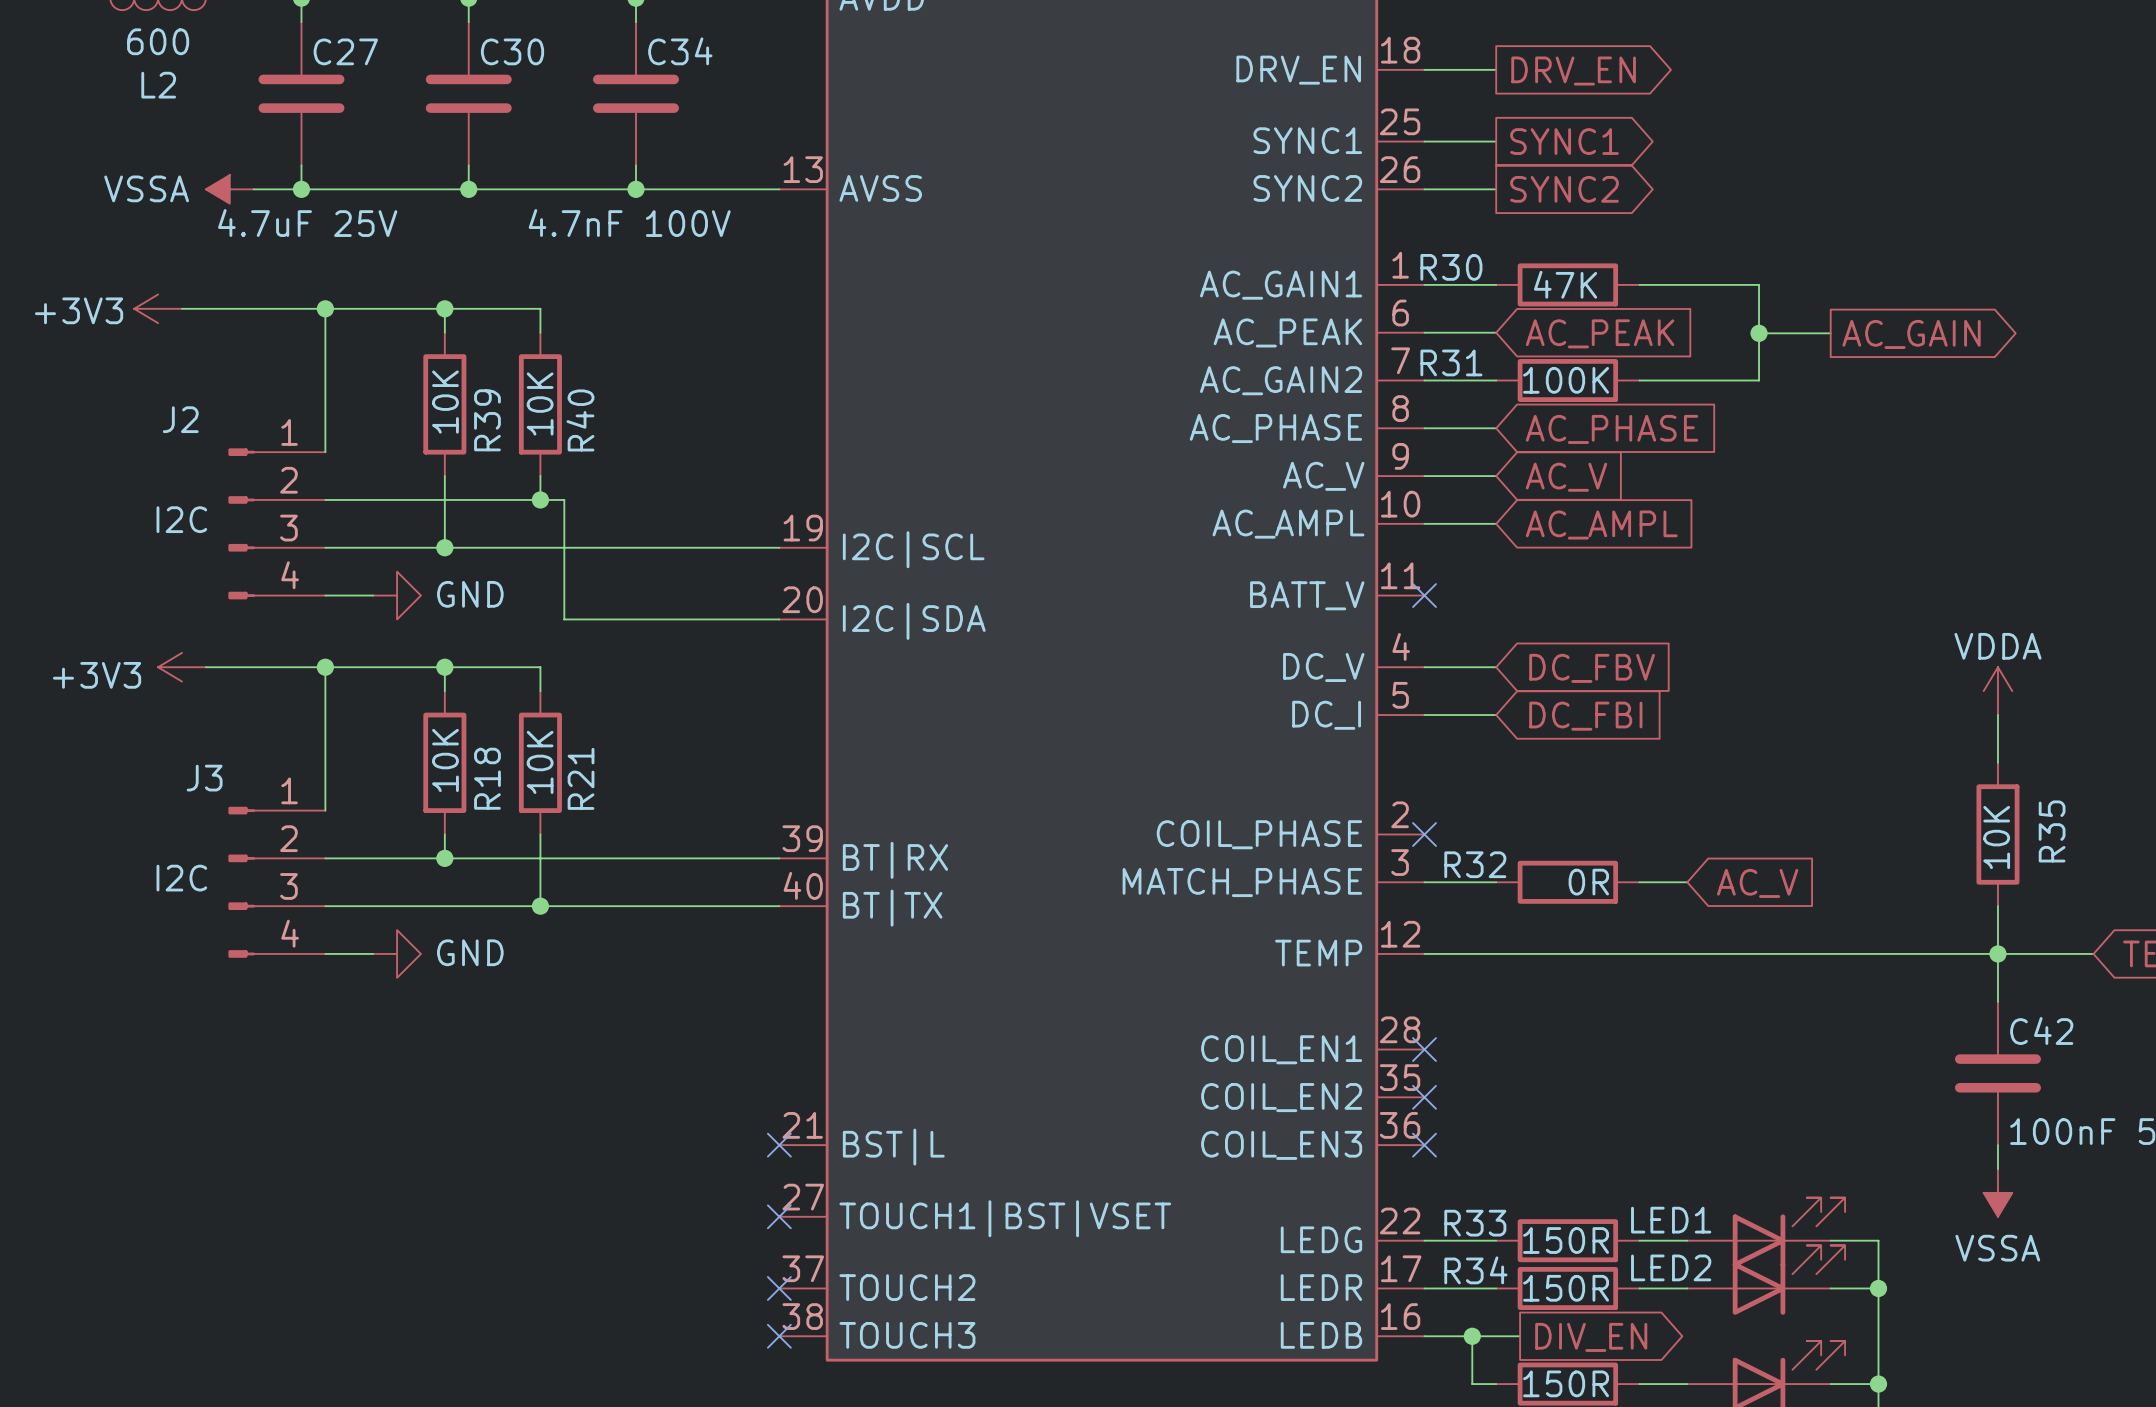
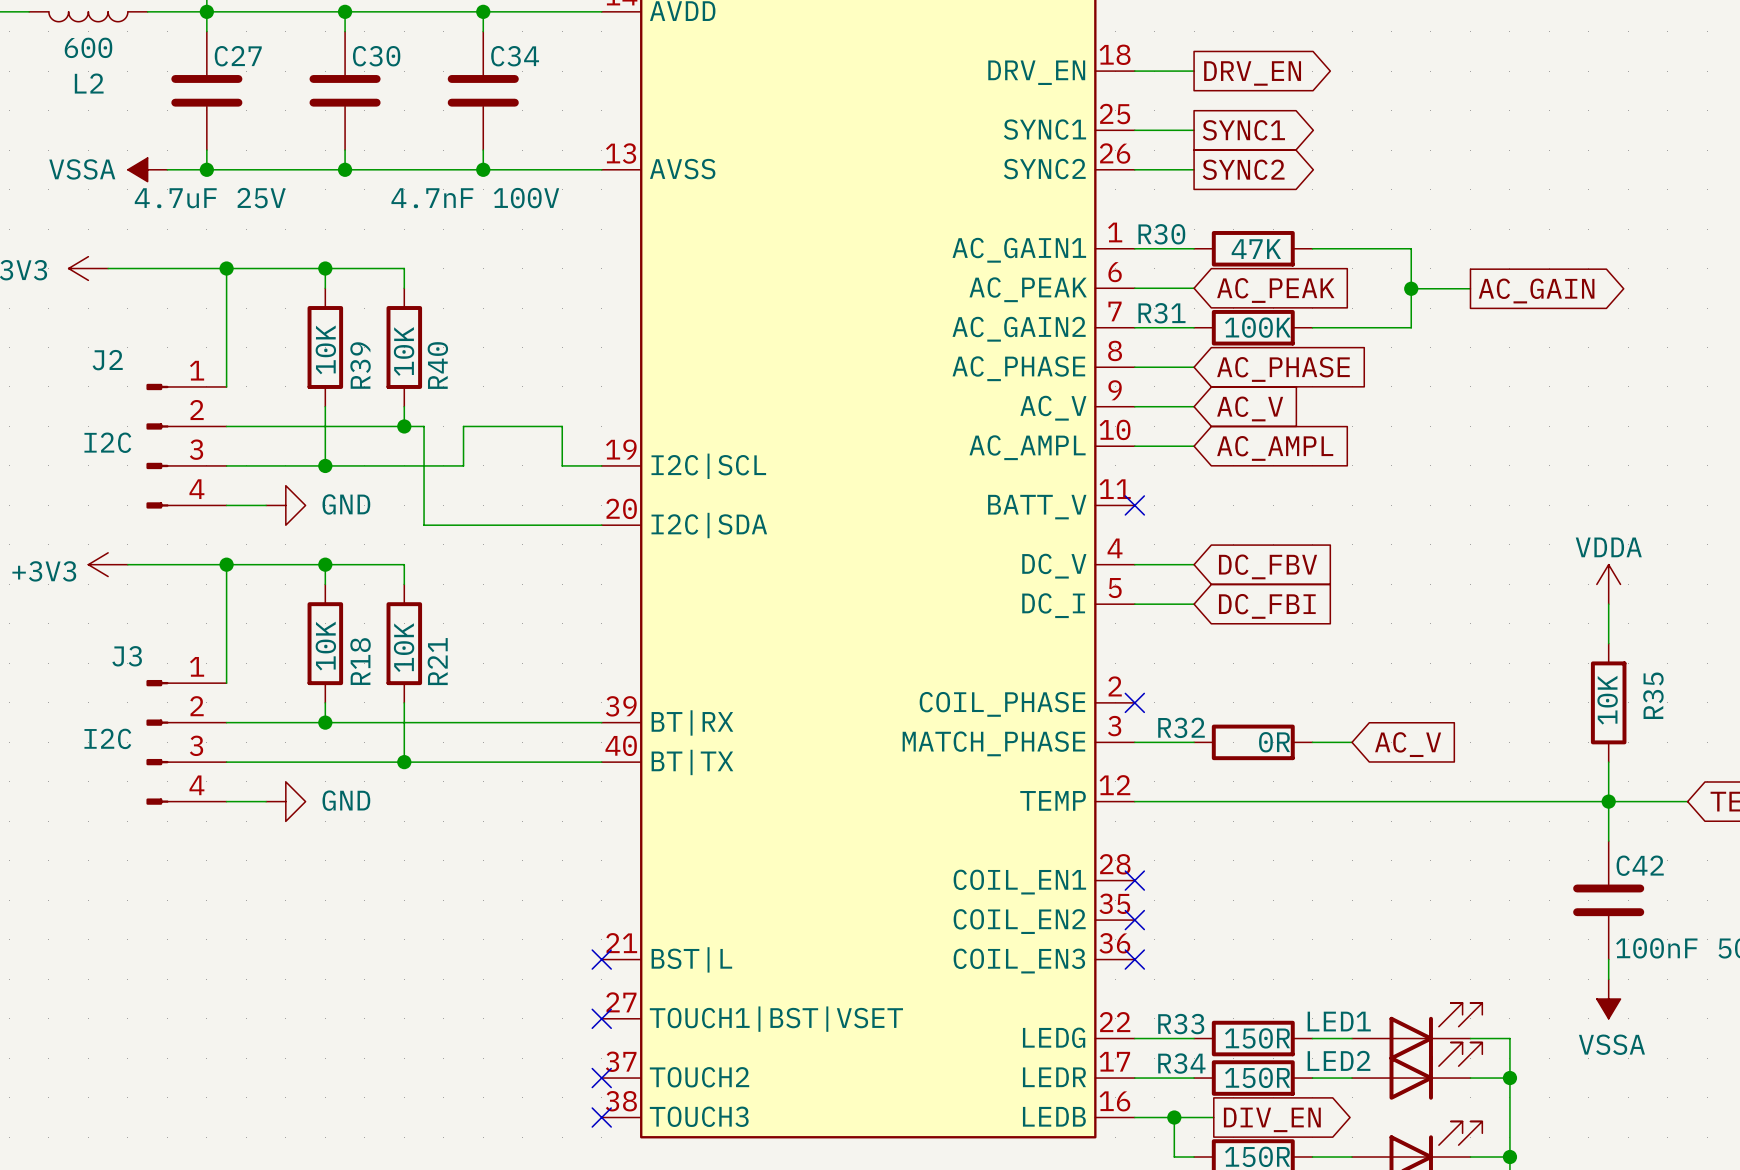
wire: (612, 547) (731, 547) -> (463, 465) (463, 426) (562, 426) (562, 465)

